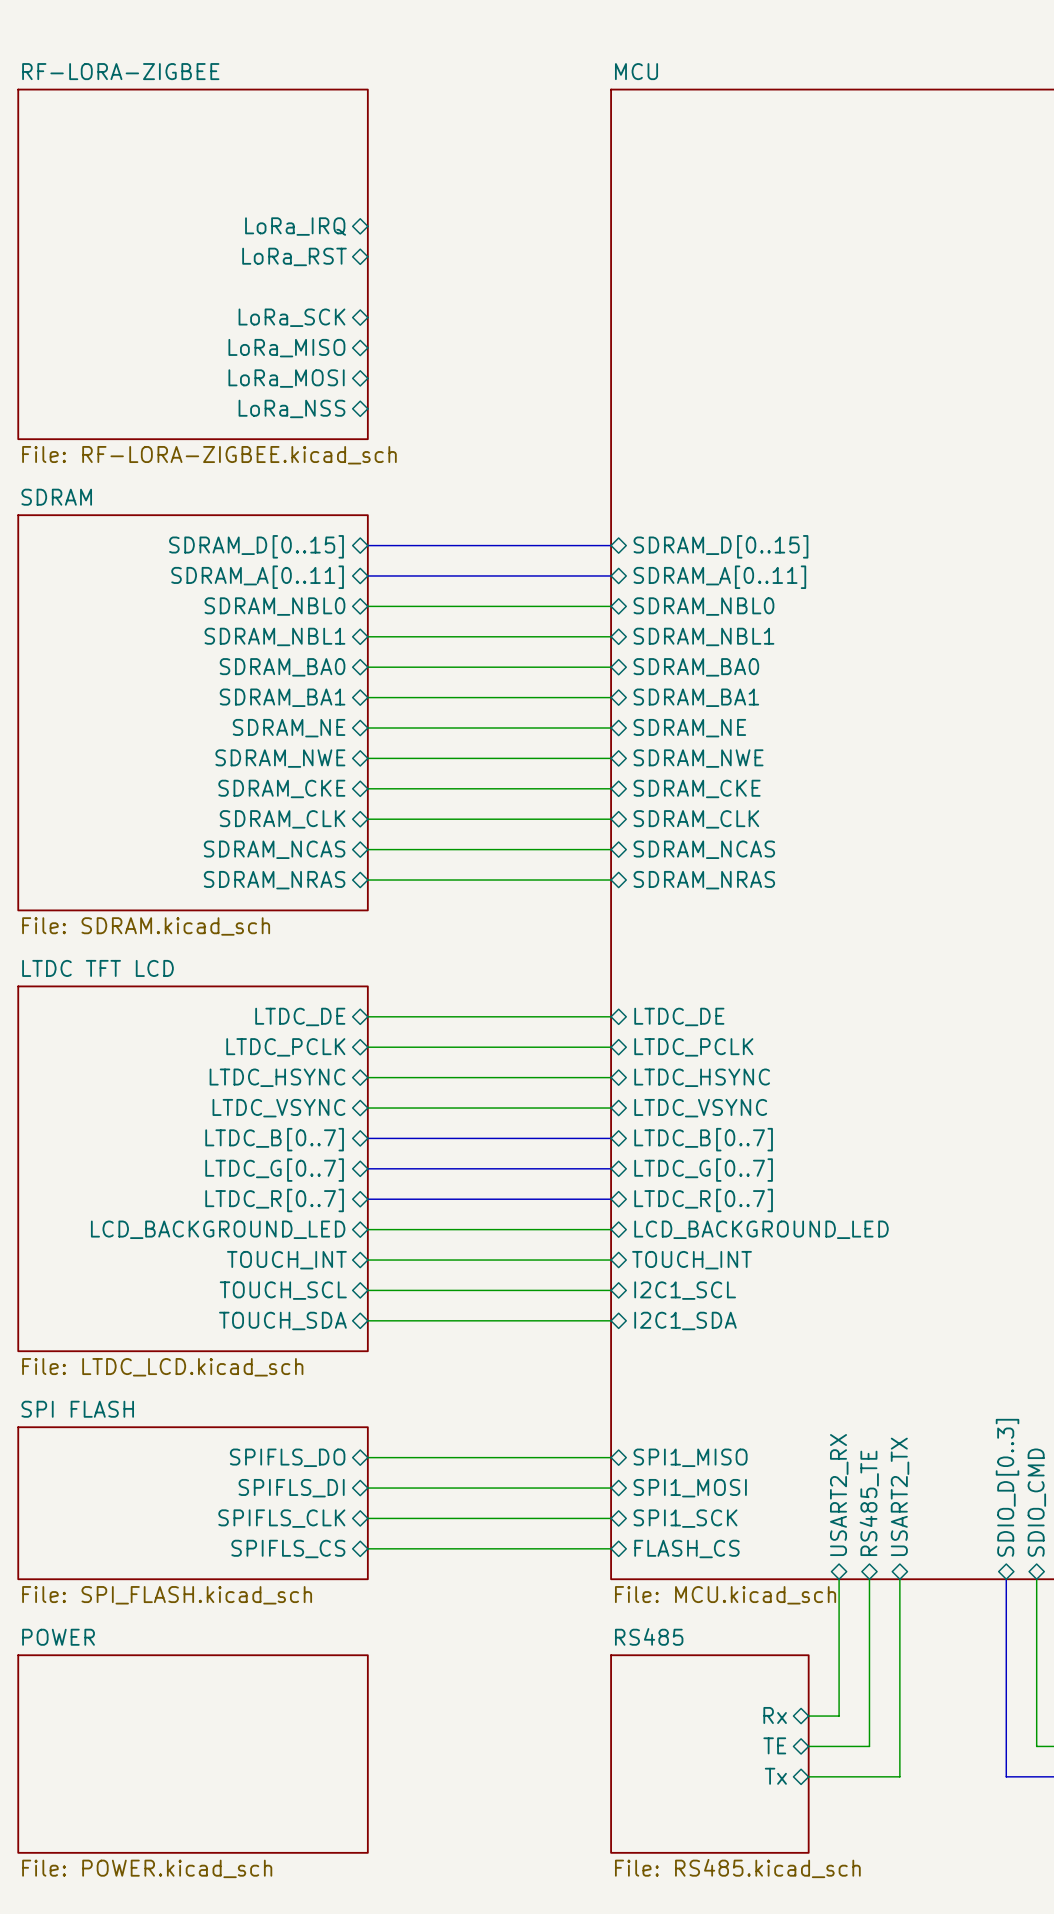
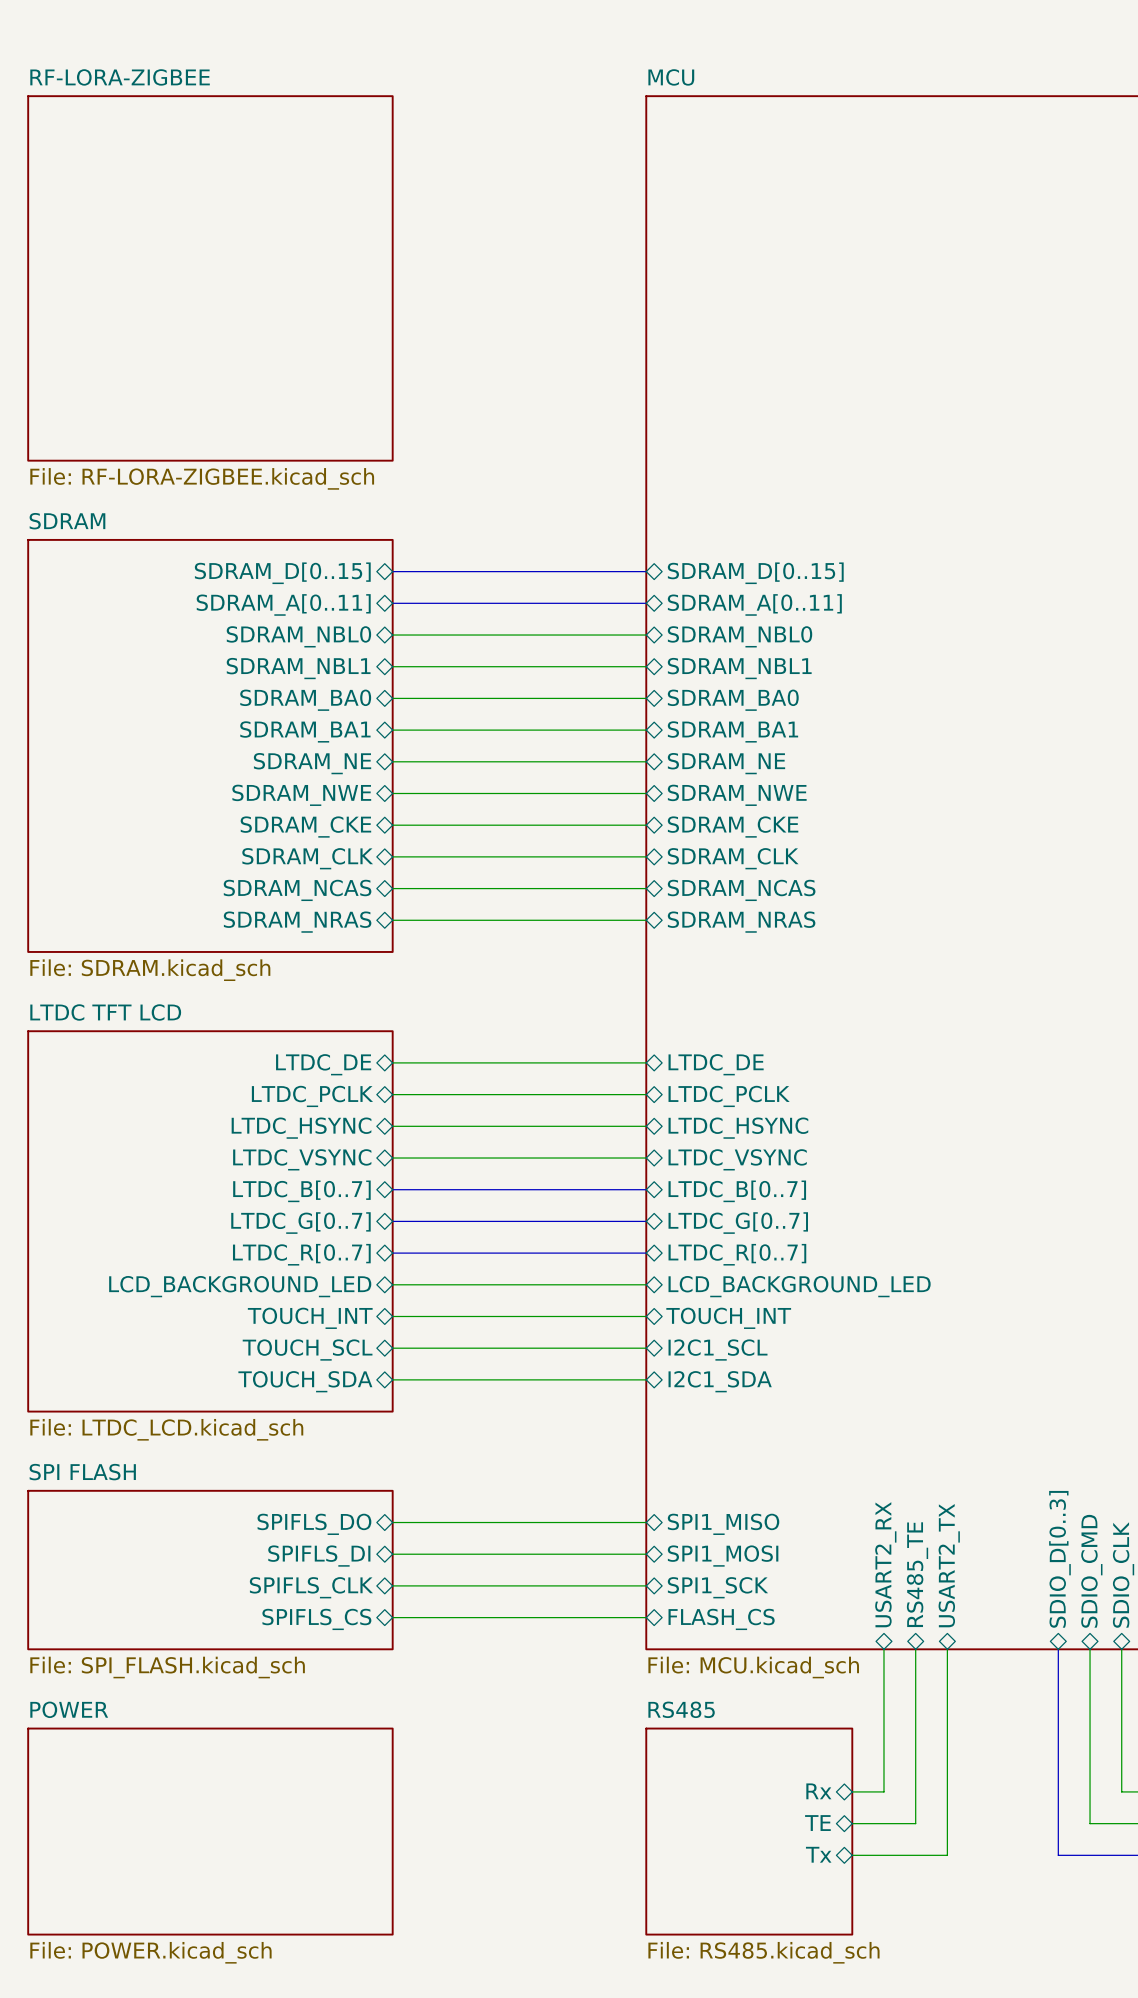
sheet pin: LoRa_IRQ (295, 226) -> none
sheet pin: LoRa_RST (294, 256) -> none
sheet pin: LoRa_SCK (291, 317) -> none
sheet pin: LoRa_MISO (286, 348) -> none
sheet pin: LoRa_MOSI (286, 378) -> none
sheet pin: LoRa_NSS (291, 408) -> none

